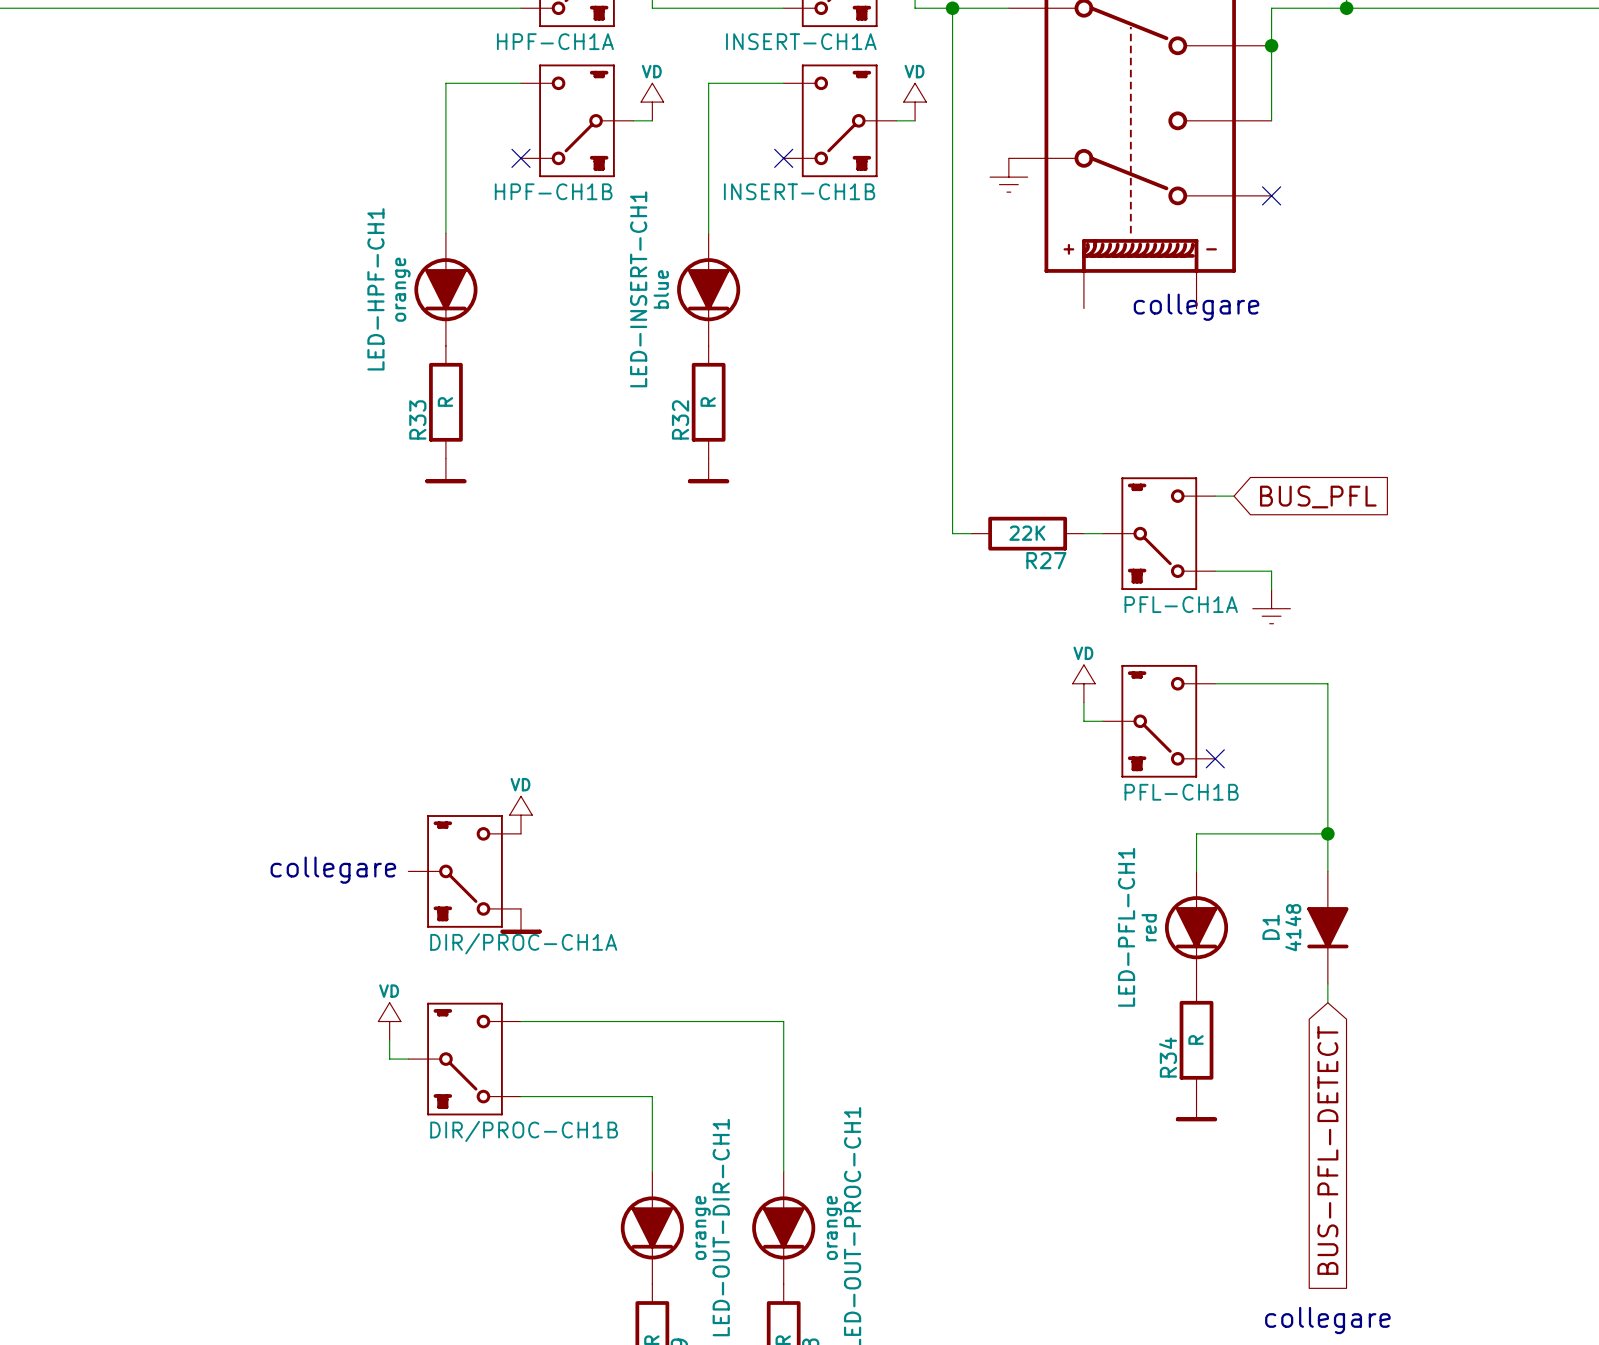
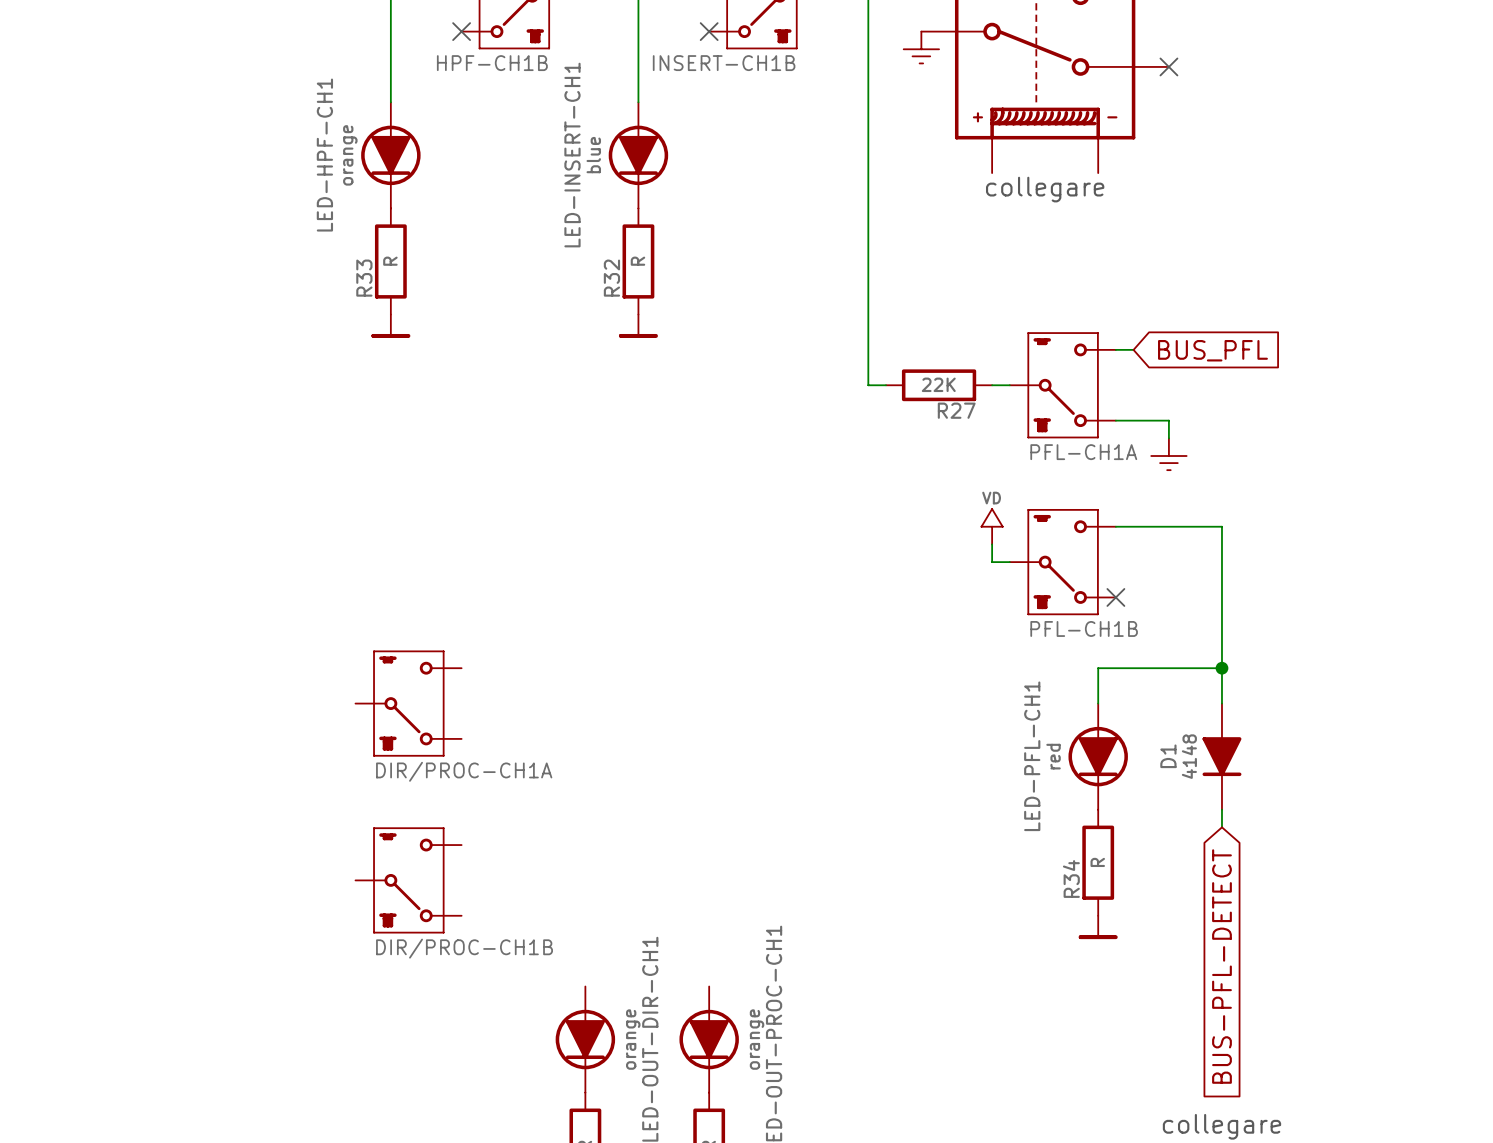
text position: collegare (1196, 307) -> collegare (1045, 189)
power symbol: VD (520, 815) -> none
text: collegare (333, 870) -> none
power symbol: (520, 921) -> none
power symbol: VD (389, 1021) -> none
wire: (520, 1021) (783, 1021) (783, 1171) -> none
wire: (389, 1040) (389, 1059) (408, 1059) -> none
wire: (520, 1096) (652, 1096) (652, 1171) -> none

